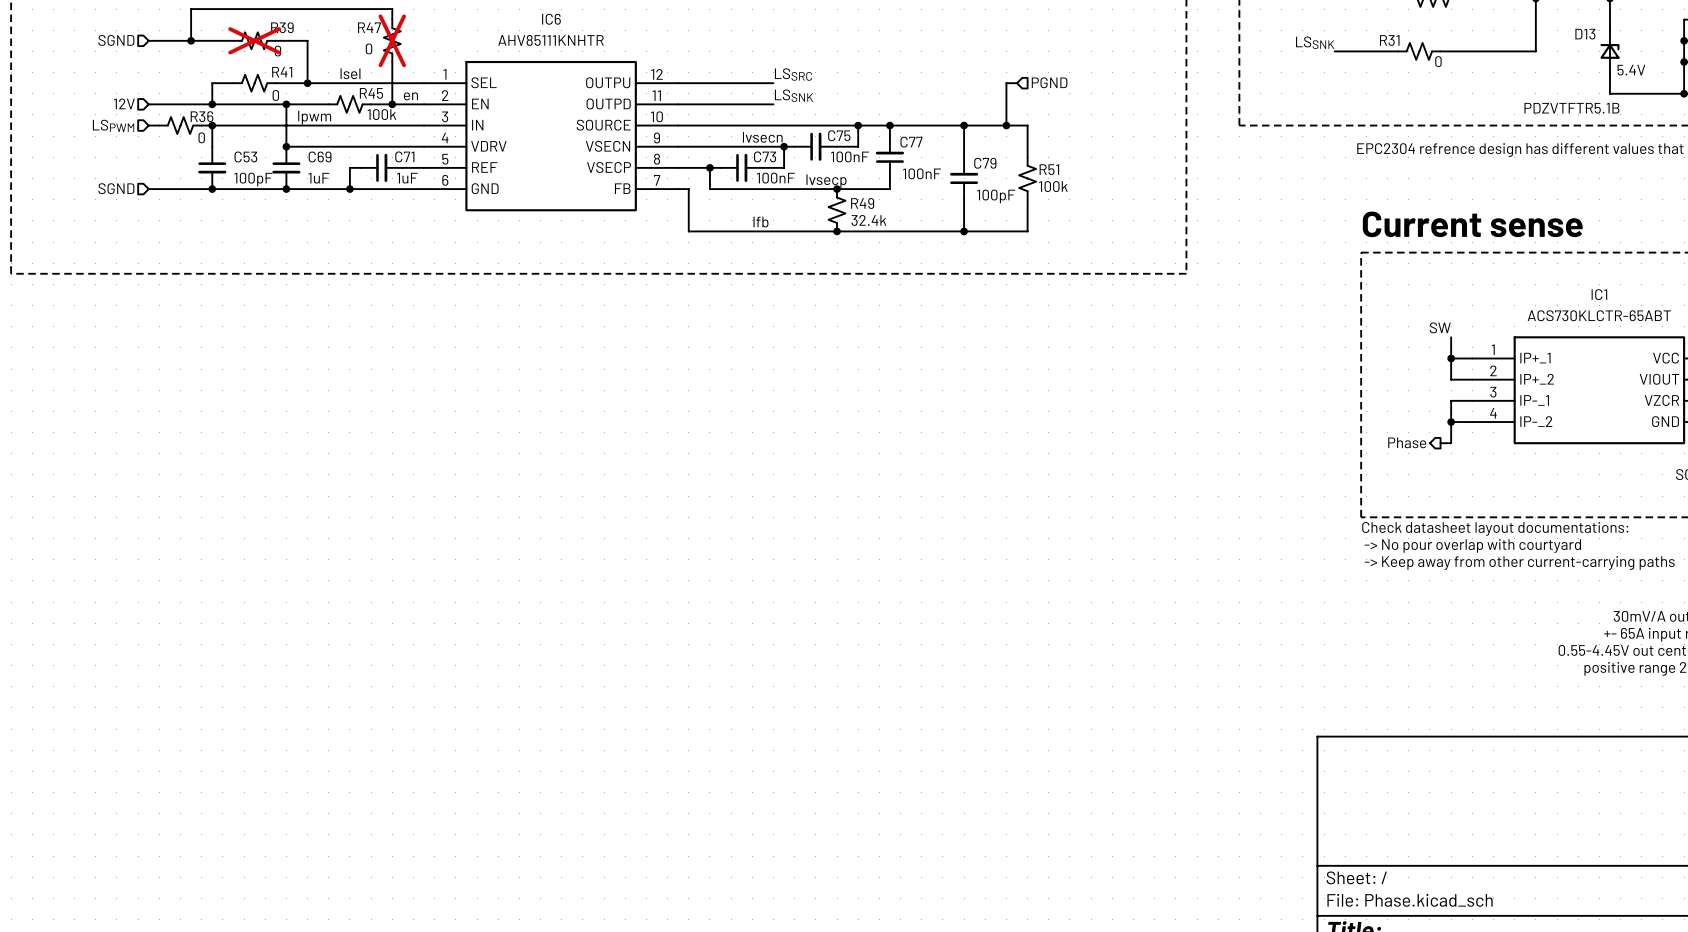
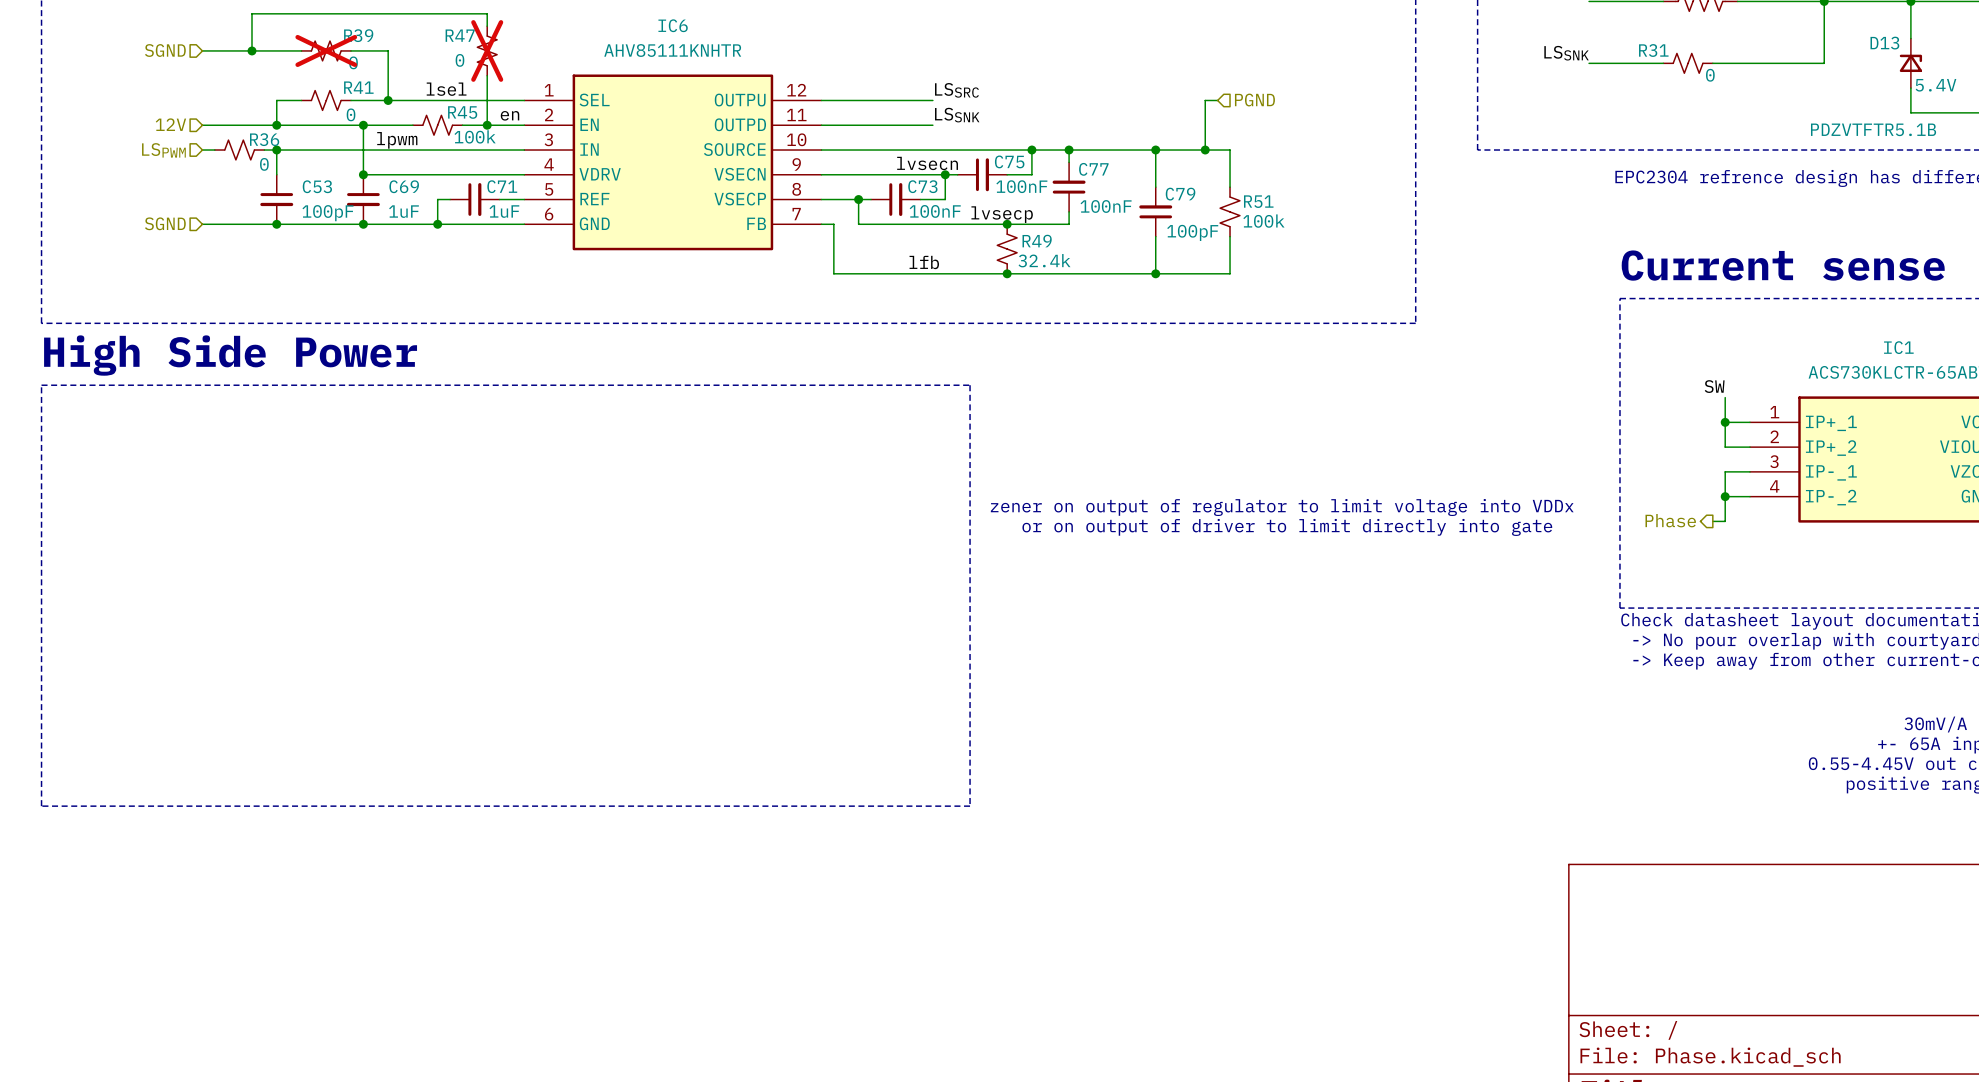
text: none -> High Side Power (230, 355)
line: none -> (41, 385) (970, 385) (970, 806) (41, 806) (41, 385)
text: none -> zener on output of regulator to limit voltage into VDDx (1282, 507)
text: none -> or on output of driver to limit directly into gate (1287, 527)

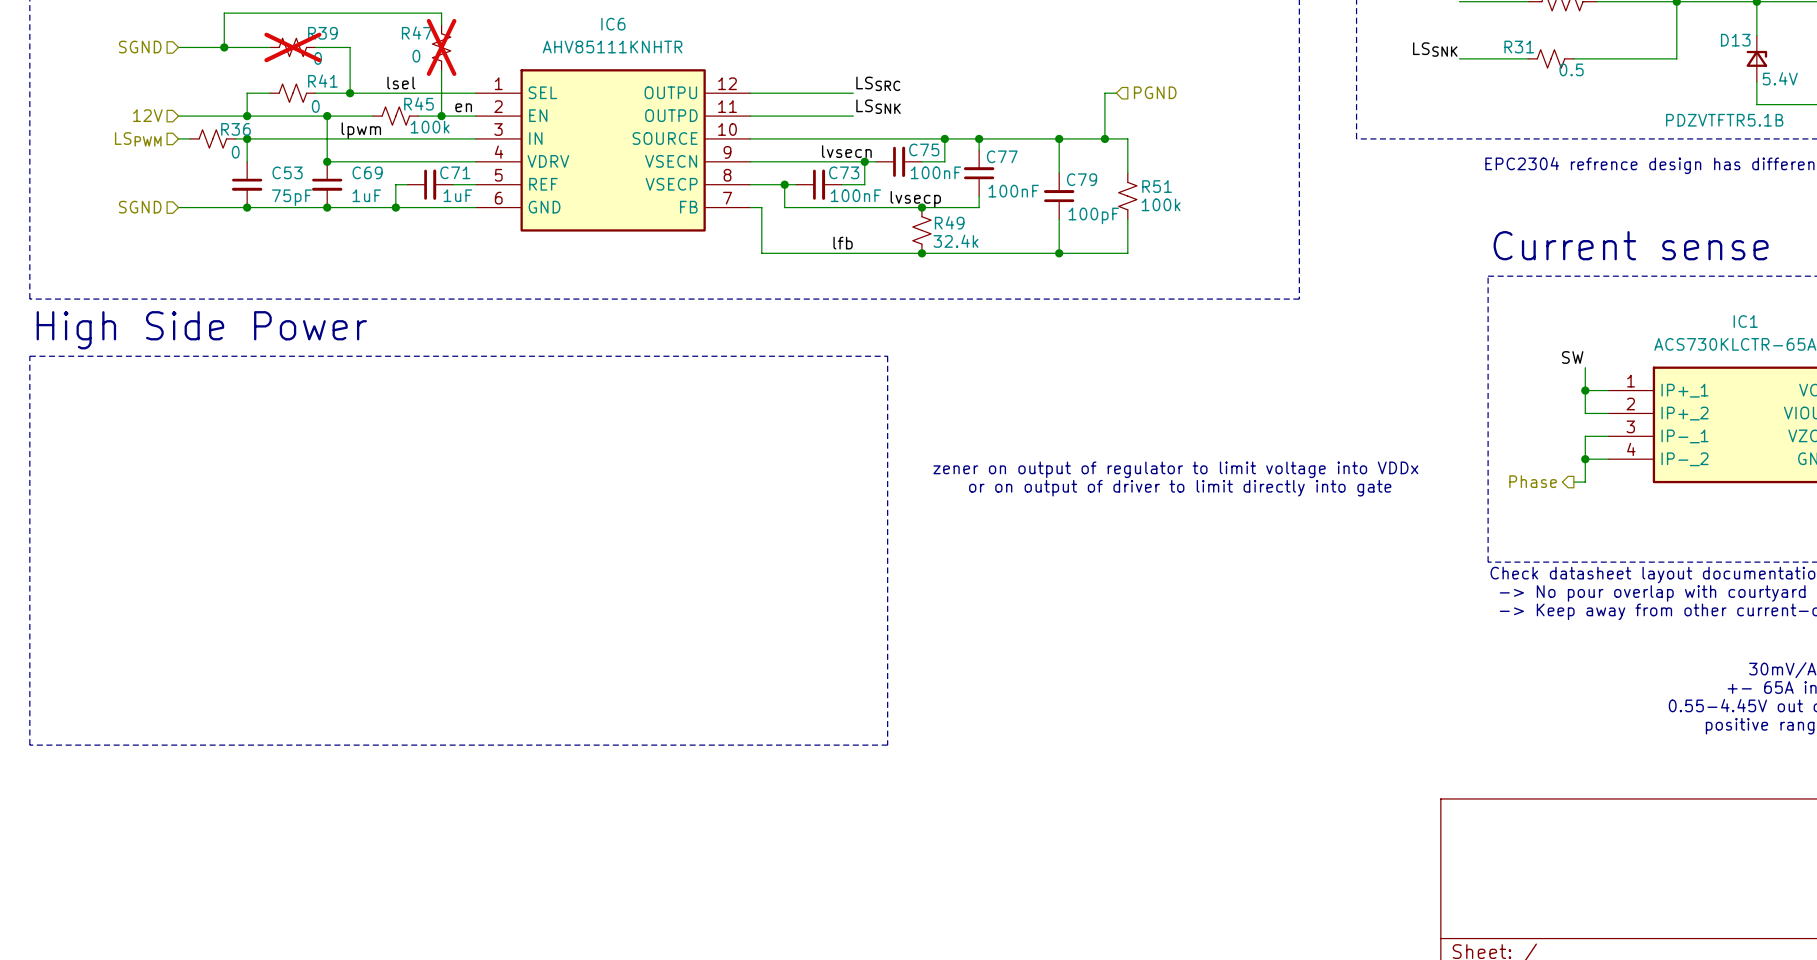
R31 value: 0 (1710, 75) -> 0.5 (1571, 69)
C53 value: 100pF (327, 213) -> 75pF (291, 197)

